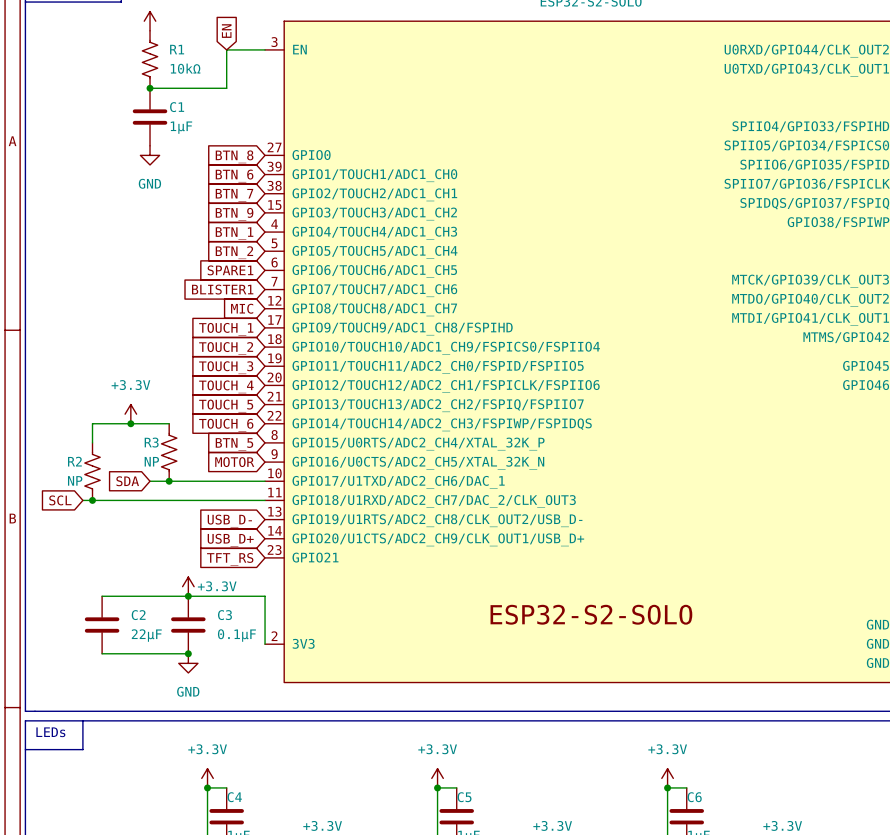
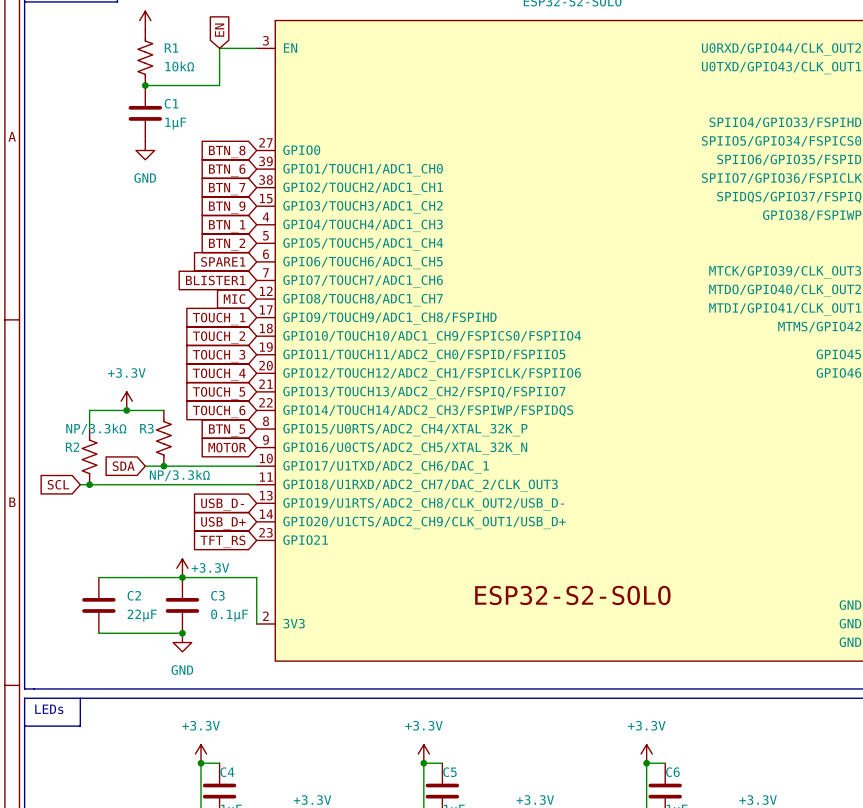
R3 value: NP (151, 461) -> NP/3.3kΩ (179, 475)
R2 value: NP (75, 480) -> NP/3.3kΩ (96, 429)

